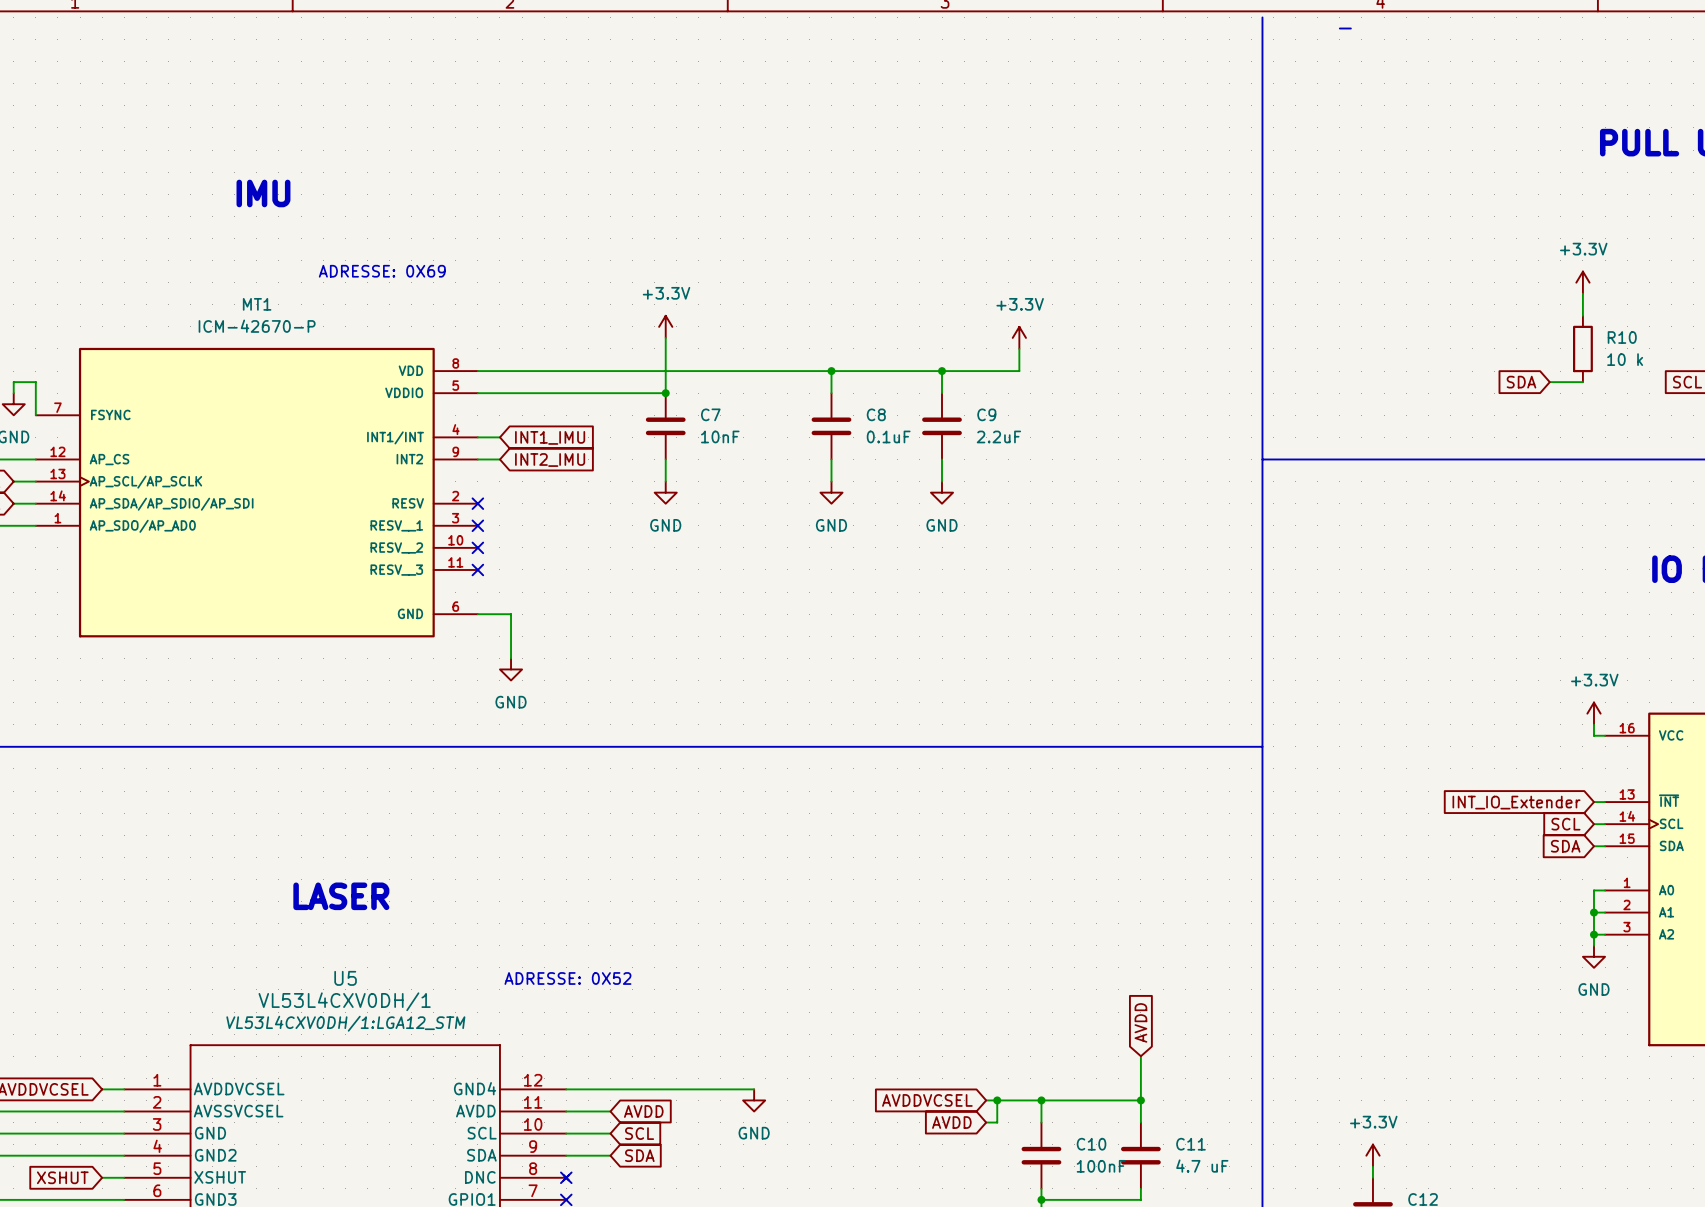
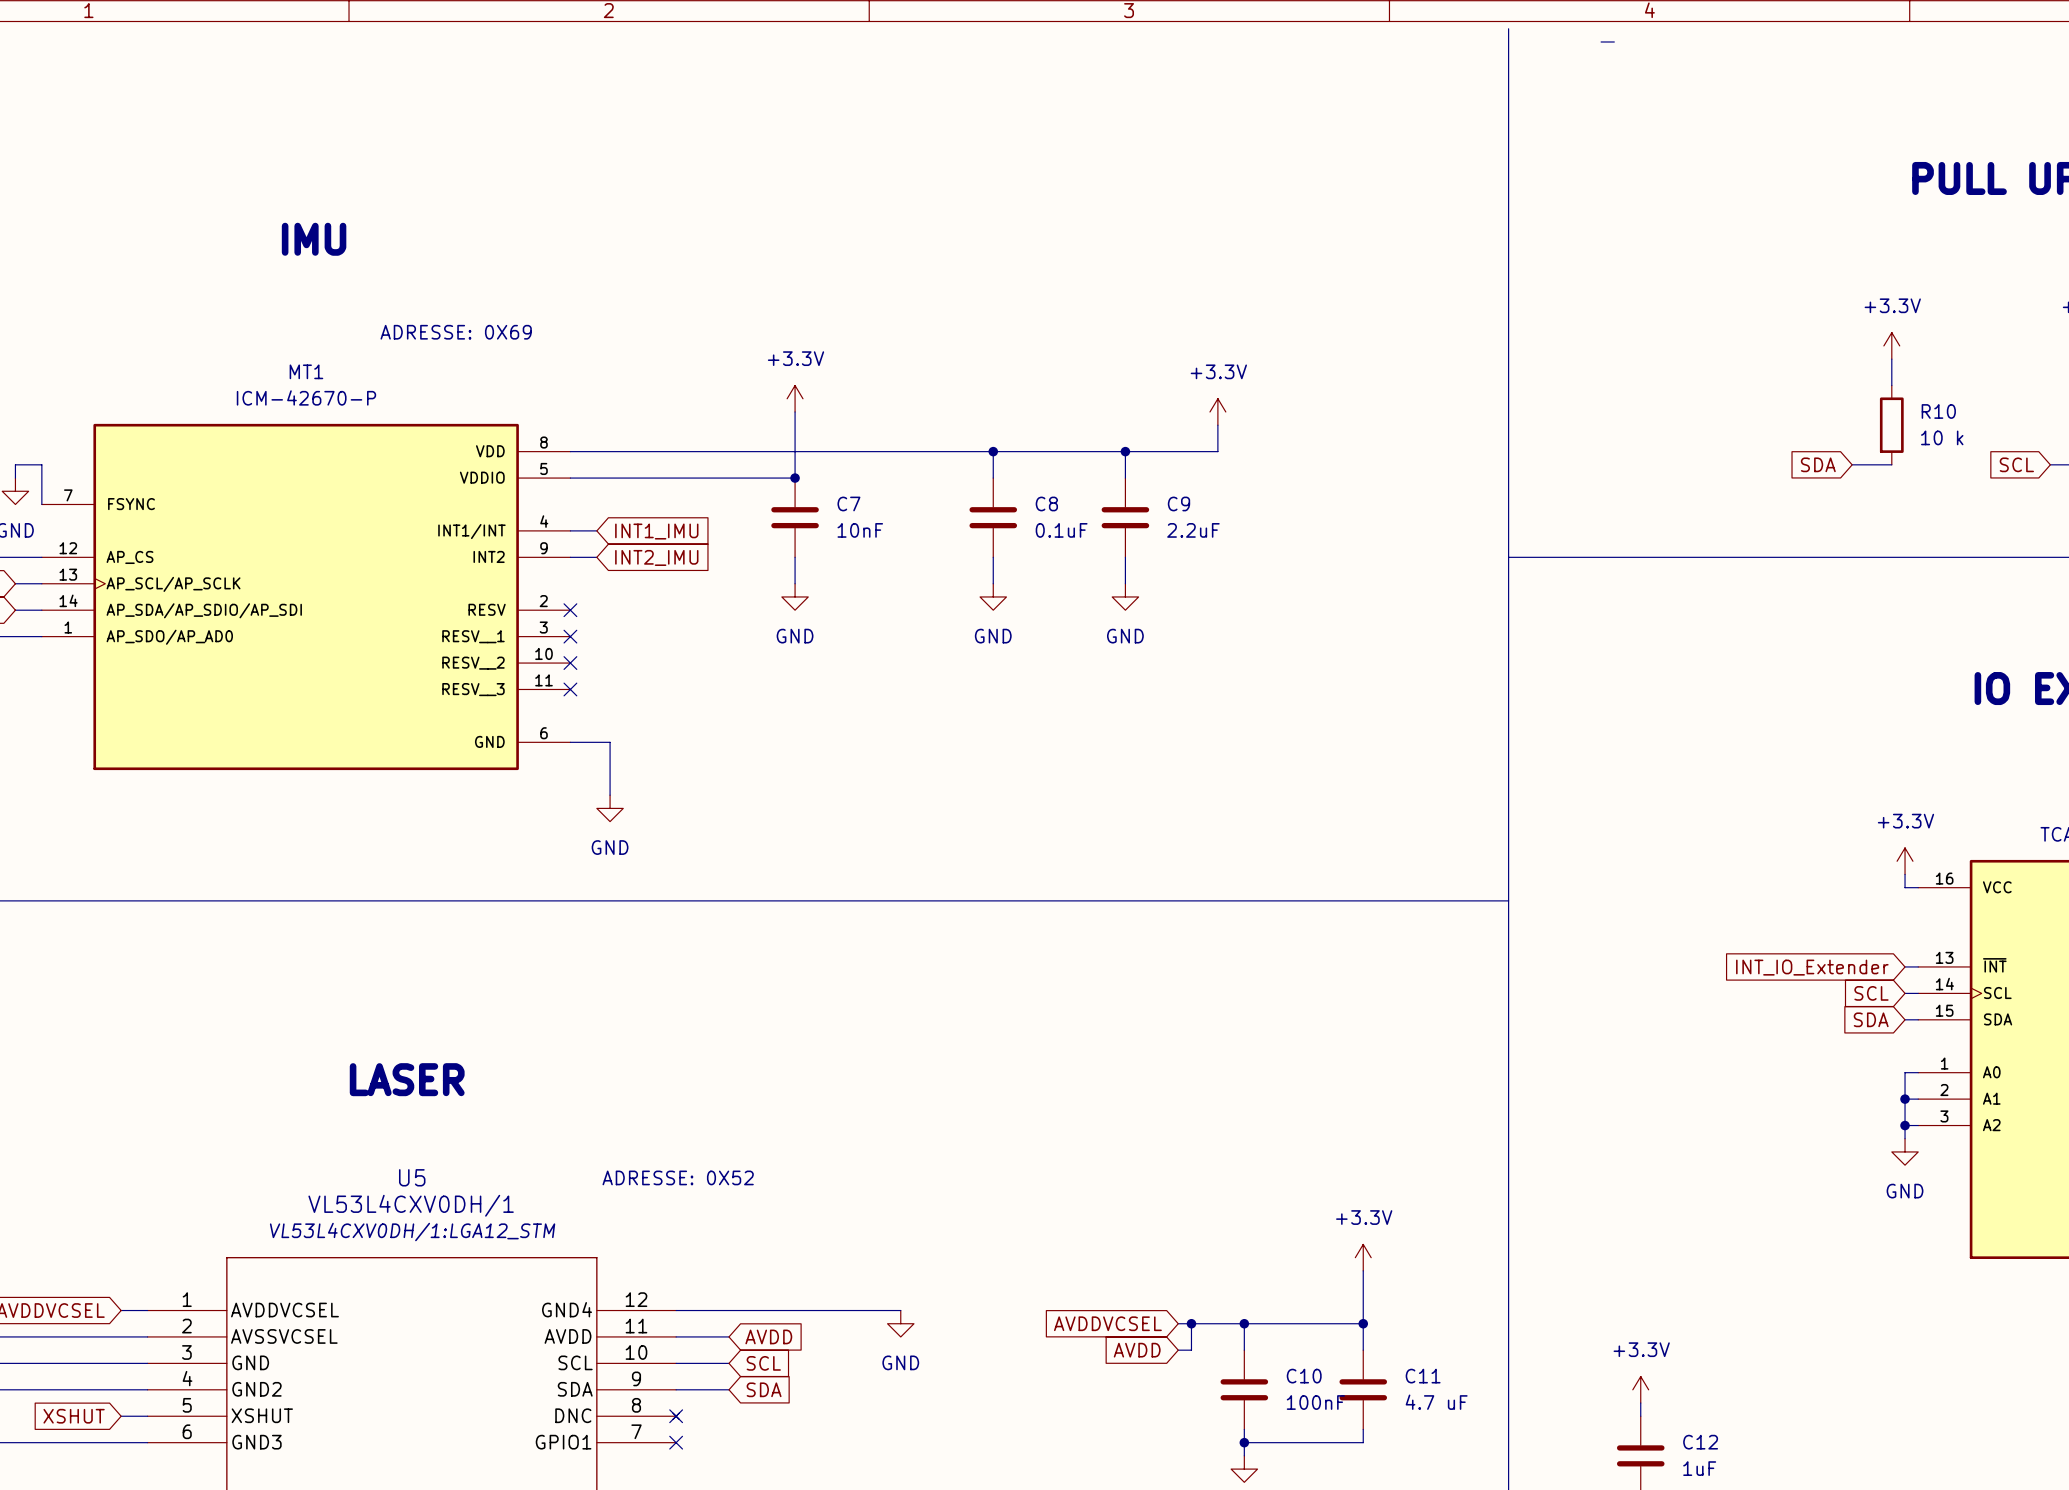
global label: AVDD (1140, 1022) -> none
power symbol: none -> +3.3V (1363, 1257)

